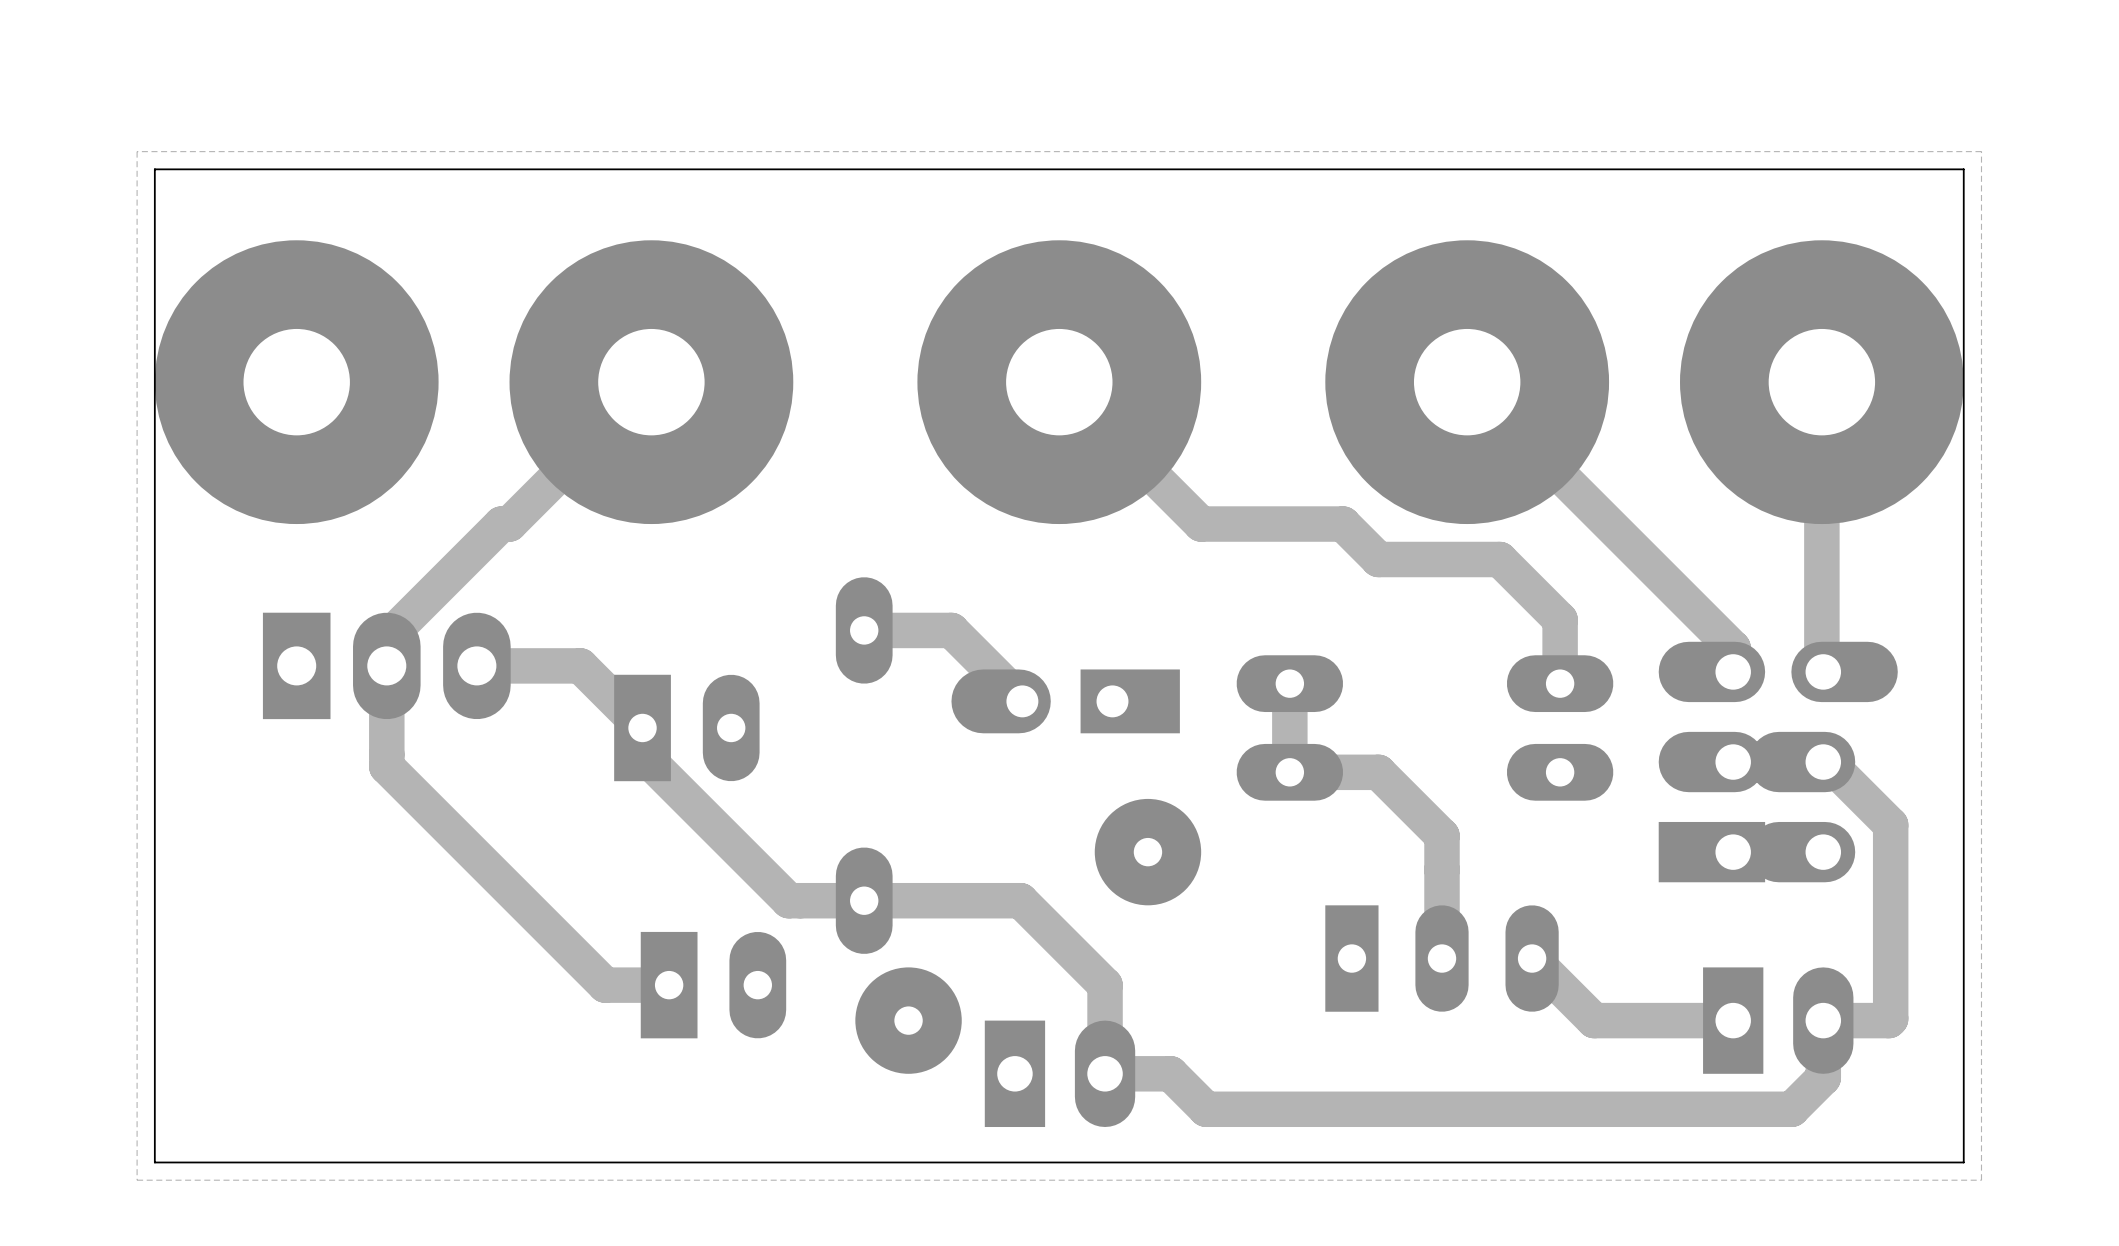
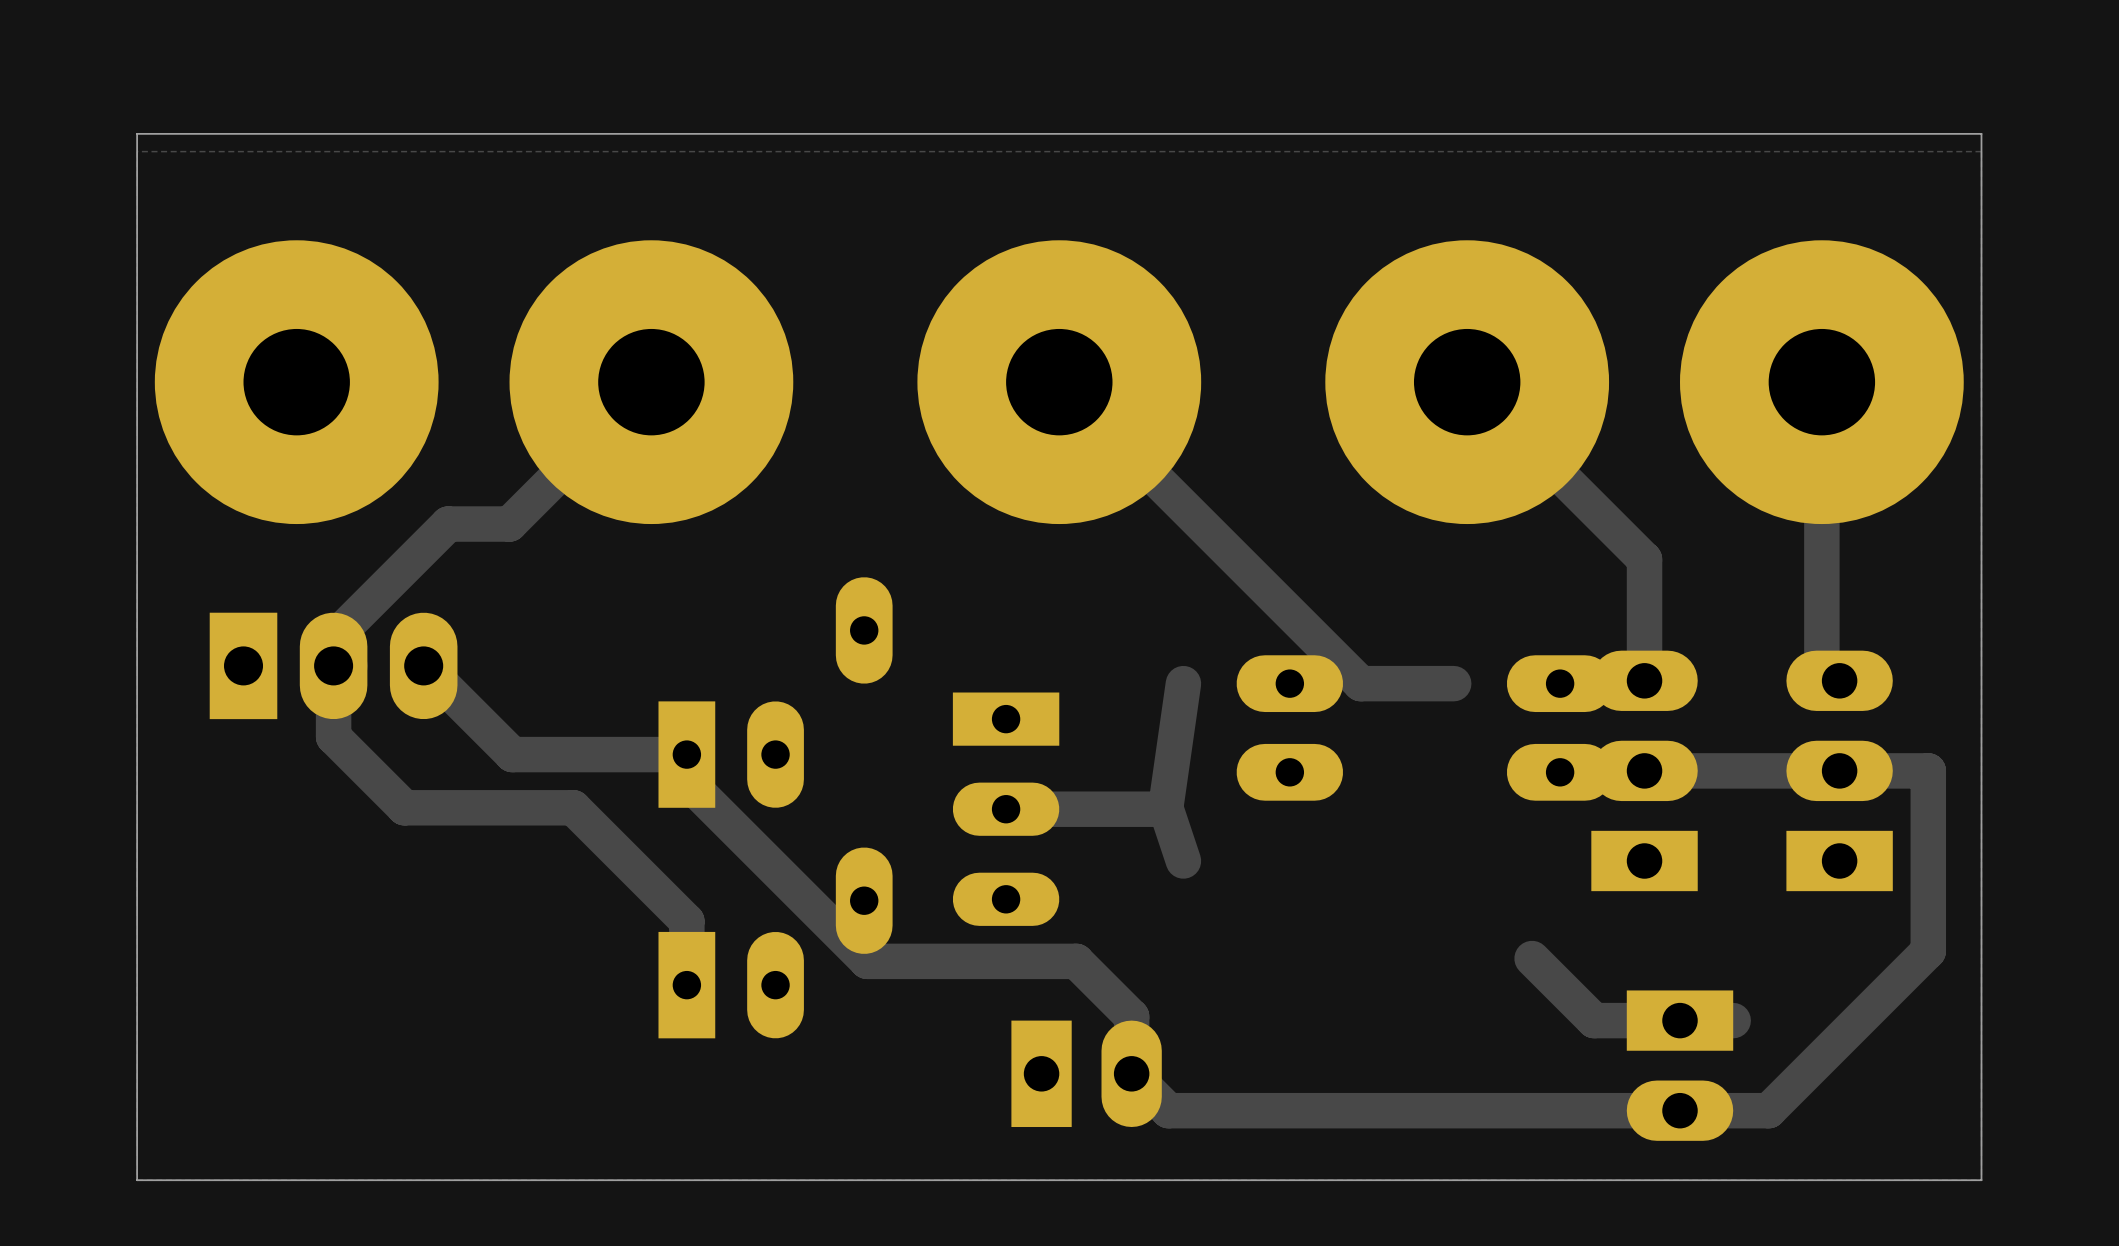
board edge: (1963, 169) (154, 169) (154, 1162) (1963, 1162) (1963, 169) -> (1981, 133) (1981, 1180) (137, 1180) (137, 133) (1981, 133)
track: (501, 524) (386, 638) (386, 766) (605, 985) (669, 985) -> (501, 524) (448, 524) (333, 638) (333, 736) (404, 807) (573, 807) (686, 921) (686, 985)
track: (1201, 524) (1343, 524) (1378, 559) (1499, 559) (1560, 619) (1560, 683) -> (1201, 524) (1360, 683) (1453, 683)
track: (1644, 559) (1733, 648) (1733, 671) -> (1644, 559) (1644, 680)
track: (864, 630) (951, 630) (1022, 701) -> none
part position: (386, 665) -> (333, 665)
track: none -> (423, 665) (512, 754) (686, 754) (686, 781) (867, 961) (1076, 961) (1131, 1016) (1131, 1073) (1168, 1110) (1768, 1110) (1928, 951) (1928, 770) (1644, 770)
track: (476, 665) (580, 665) (642, 727) (642, 754) (788, 900) (1020, 900) (1105, 985) (1105, 1073) (1170, 1073) (1206, 1109) (1791, 1109) (1823, 1077) (1823, 1020) (1888, 1020) (1890, 1018) (1890, 824) (1827, 762) (1733, 762) -> none
track: none -> (1183, 683) (1165, 807) (1183, 860)
track: (1289, 683) (1289, 772) (1378, 772) (1442, 835) (1442, 958) -> none
part: (1065, 701) -> none
part position: (686, 727) -> (731, 754)
part: (1778, 762) -> none
part: none -> (1644, 770)
part: none -> (1839, 770)
track: none -> (1164, 809) (1006, 809)
via: (1147, 852) -> none
part rotation: 0° (1442, 958) -> 90° clockwise (1006, 809)
part position: (1442, 958) -> (1006, 809)
part position: (713, 985) -> (731, 985)
via: (908, 1020) -> none
part rotation: 0° (1778, 1020) -> 90° clockwise (1680, 1065)
part position: (1778, 1020) -> (1680, 1065)
part position: (1060, 1073) -> (1086, 1073)

